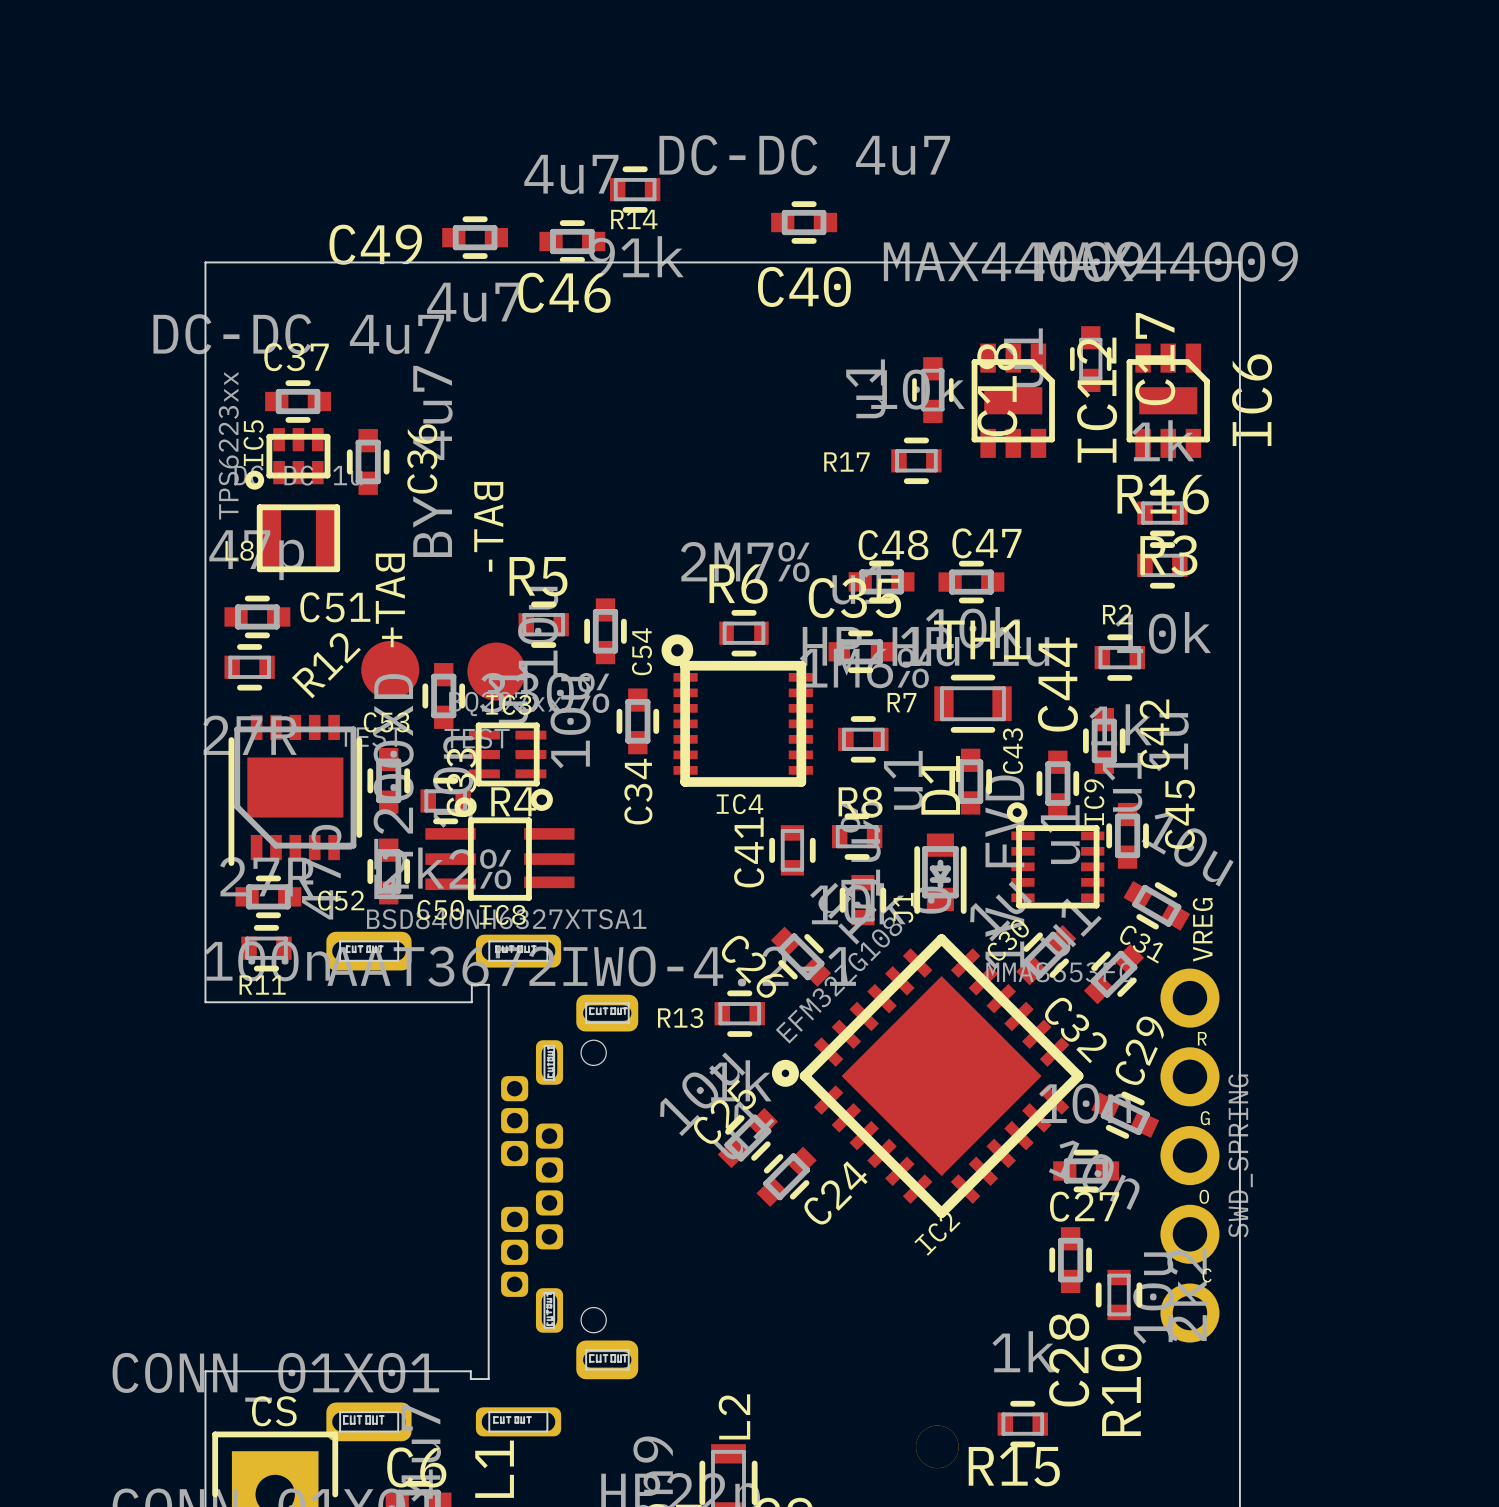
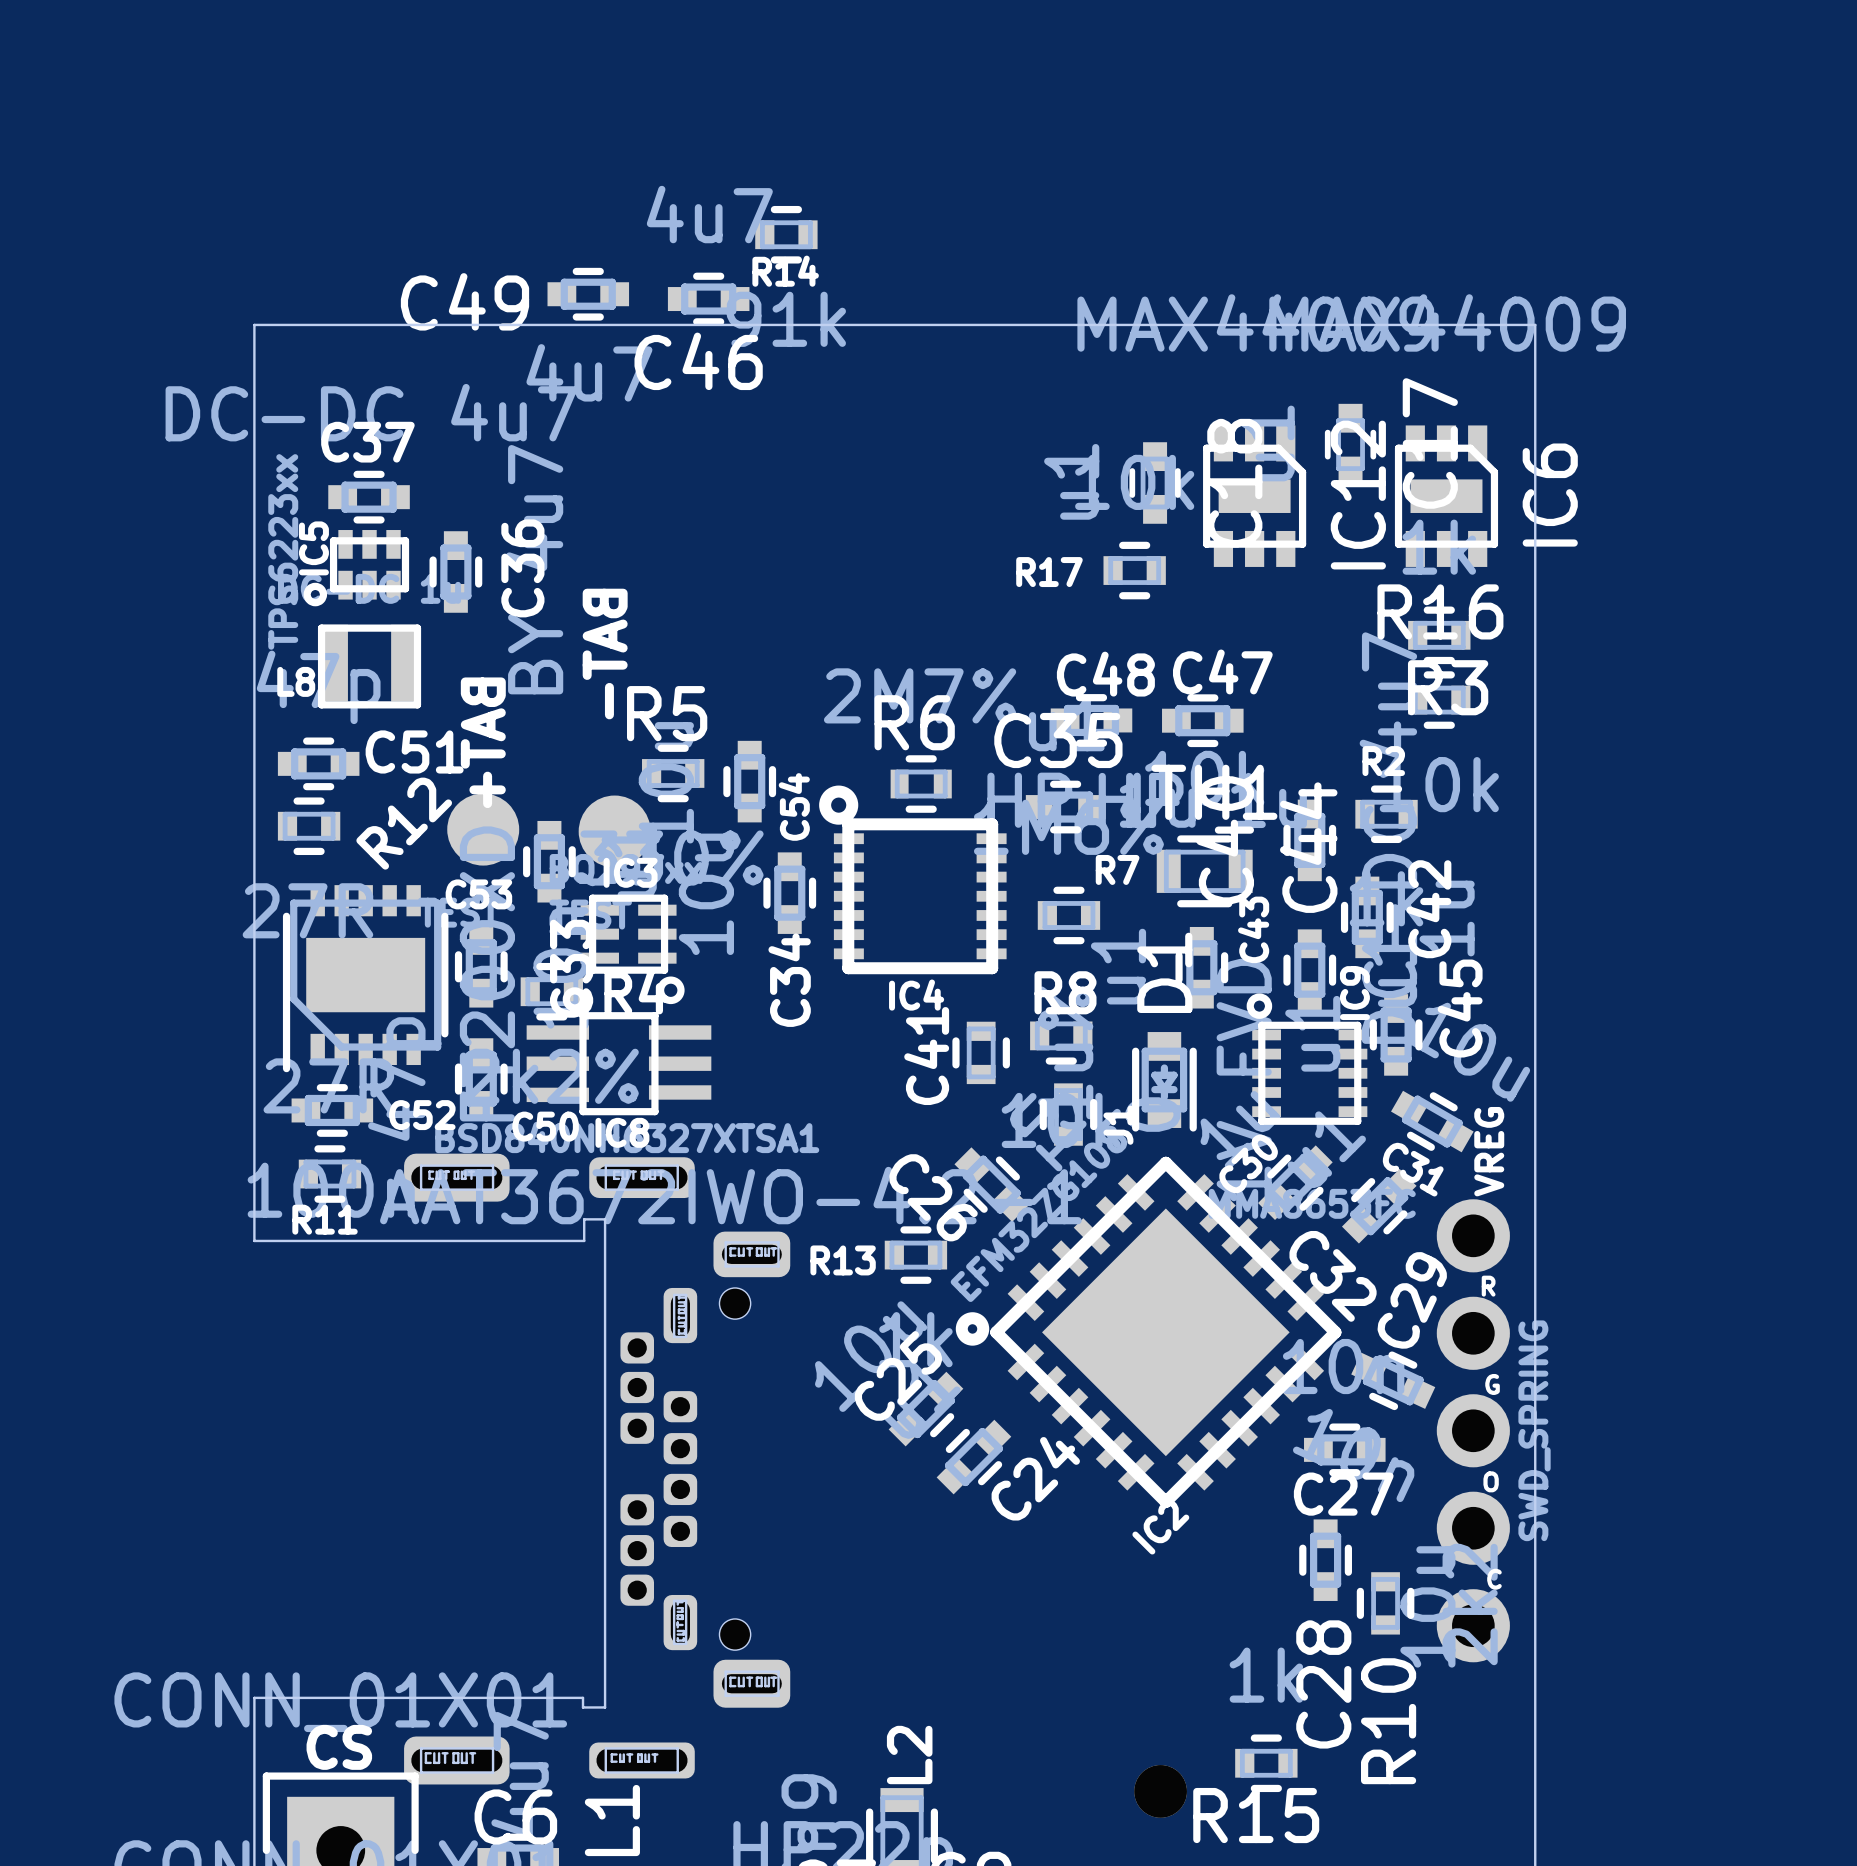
C40 rotation: 0° (804, 222) -> 90° clockwise (1309, 840)
C40 position: (804, 222) -> (1309, 840)

